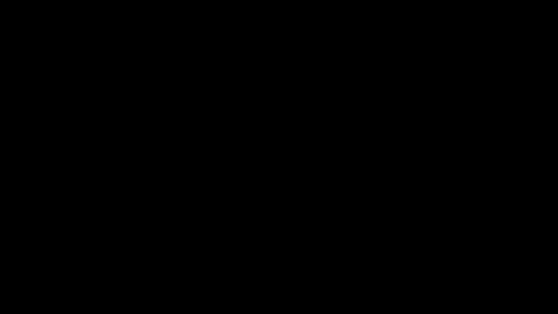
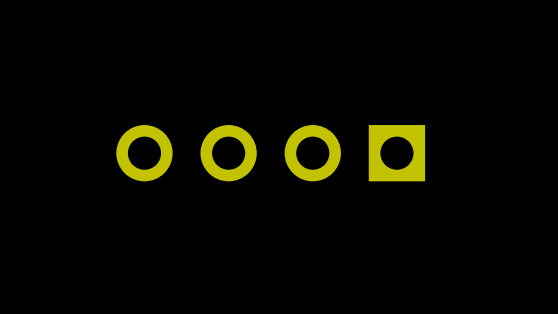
part: none -> (270, 153)

